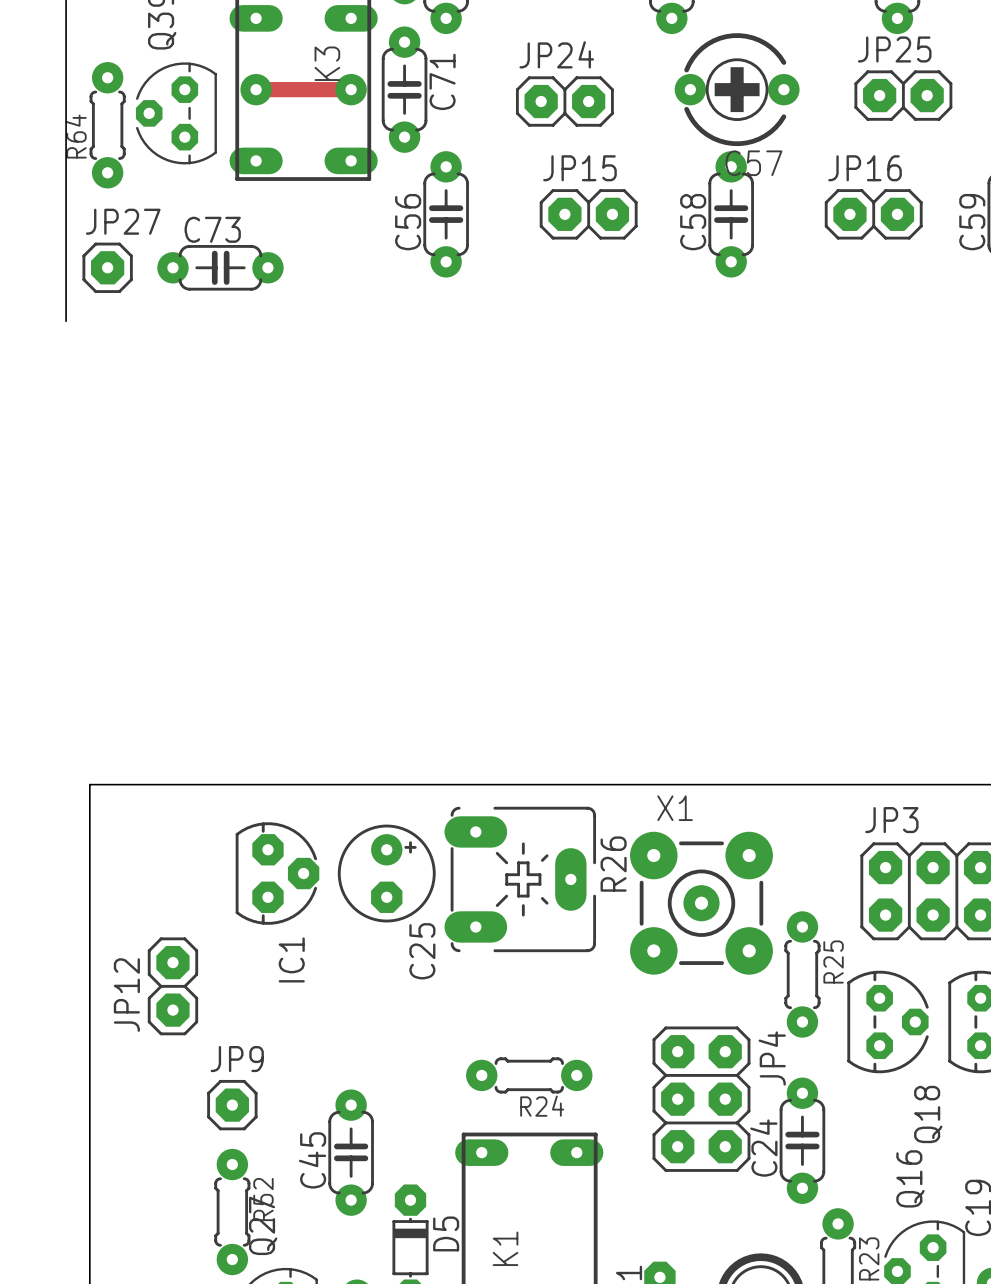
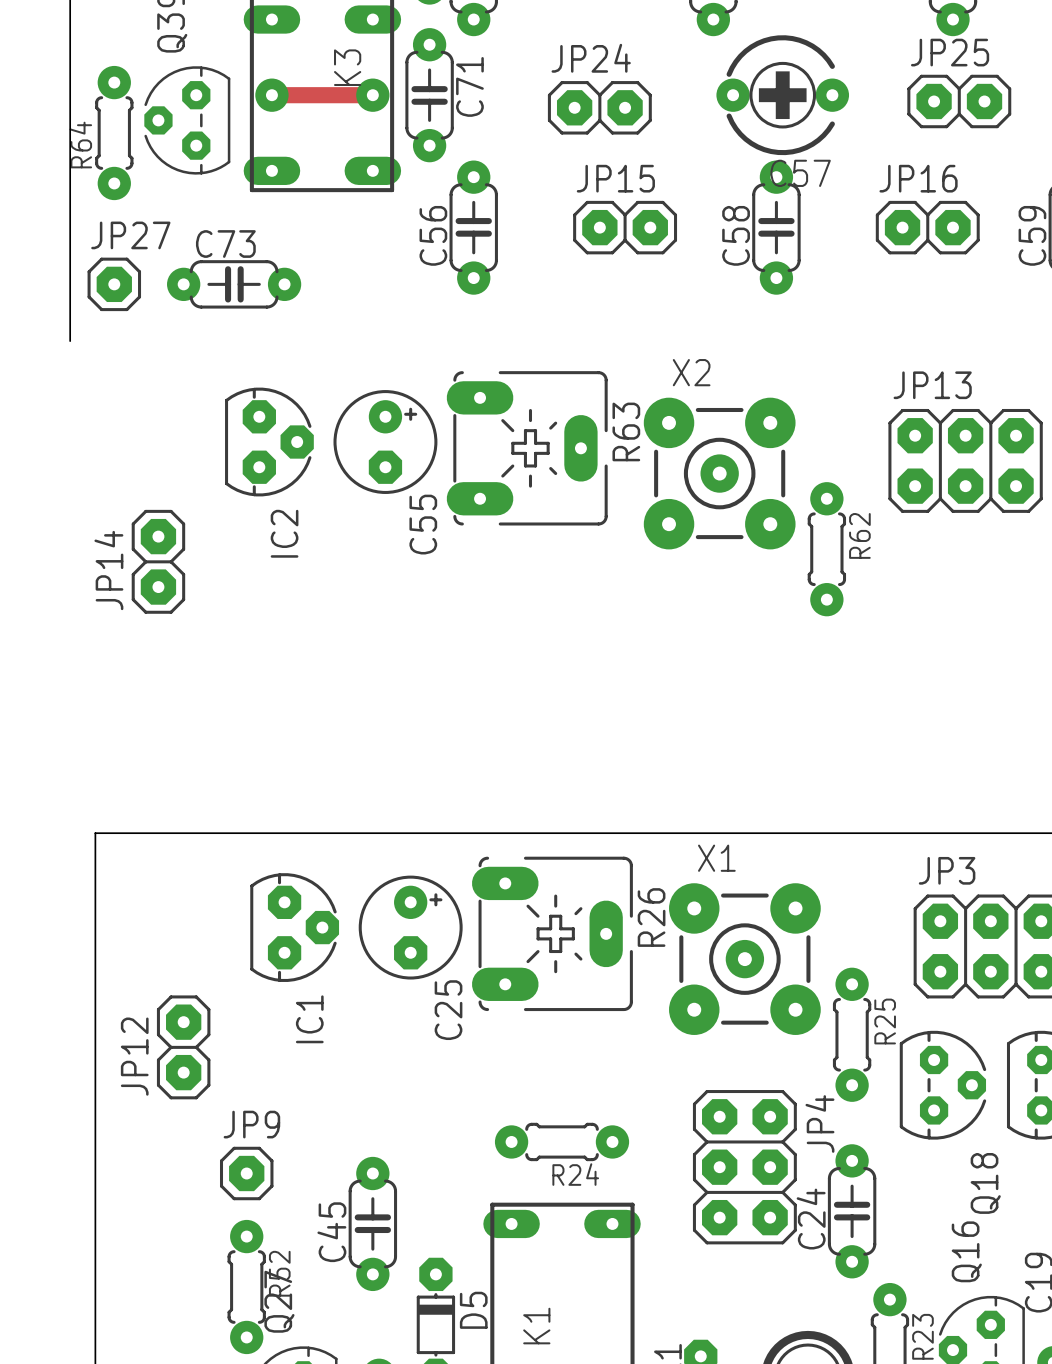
IC2: none -> (269, 442)
C55: none -> (385, 442)
R63: none -> (527, 448)
JP13: none -> (965, 460)
X2: none -> (719, 473)
R62: none -> (826, 549)
JP14: none -> (158, 561)

